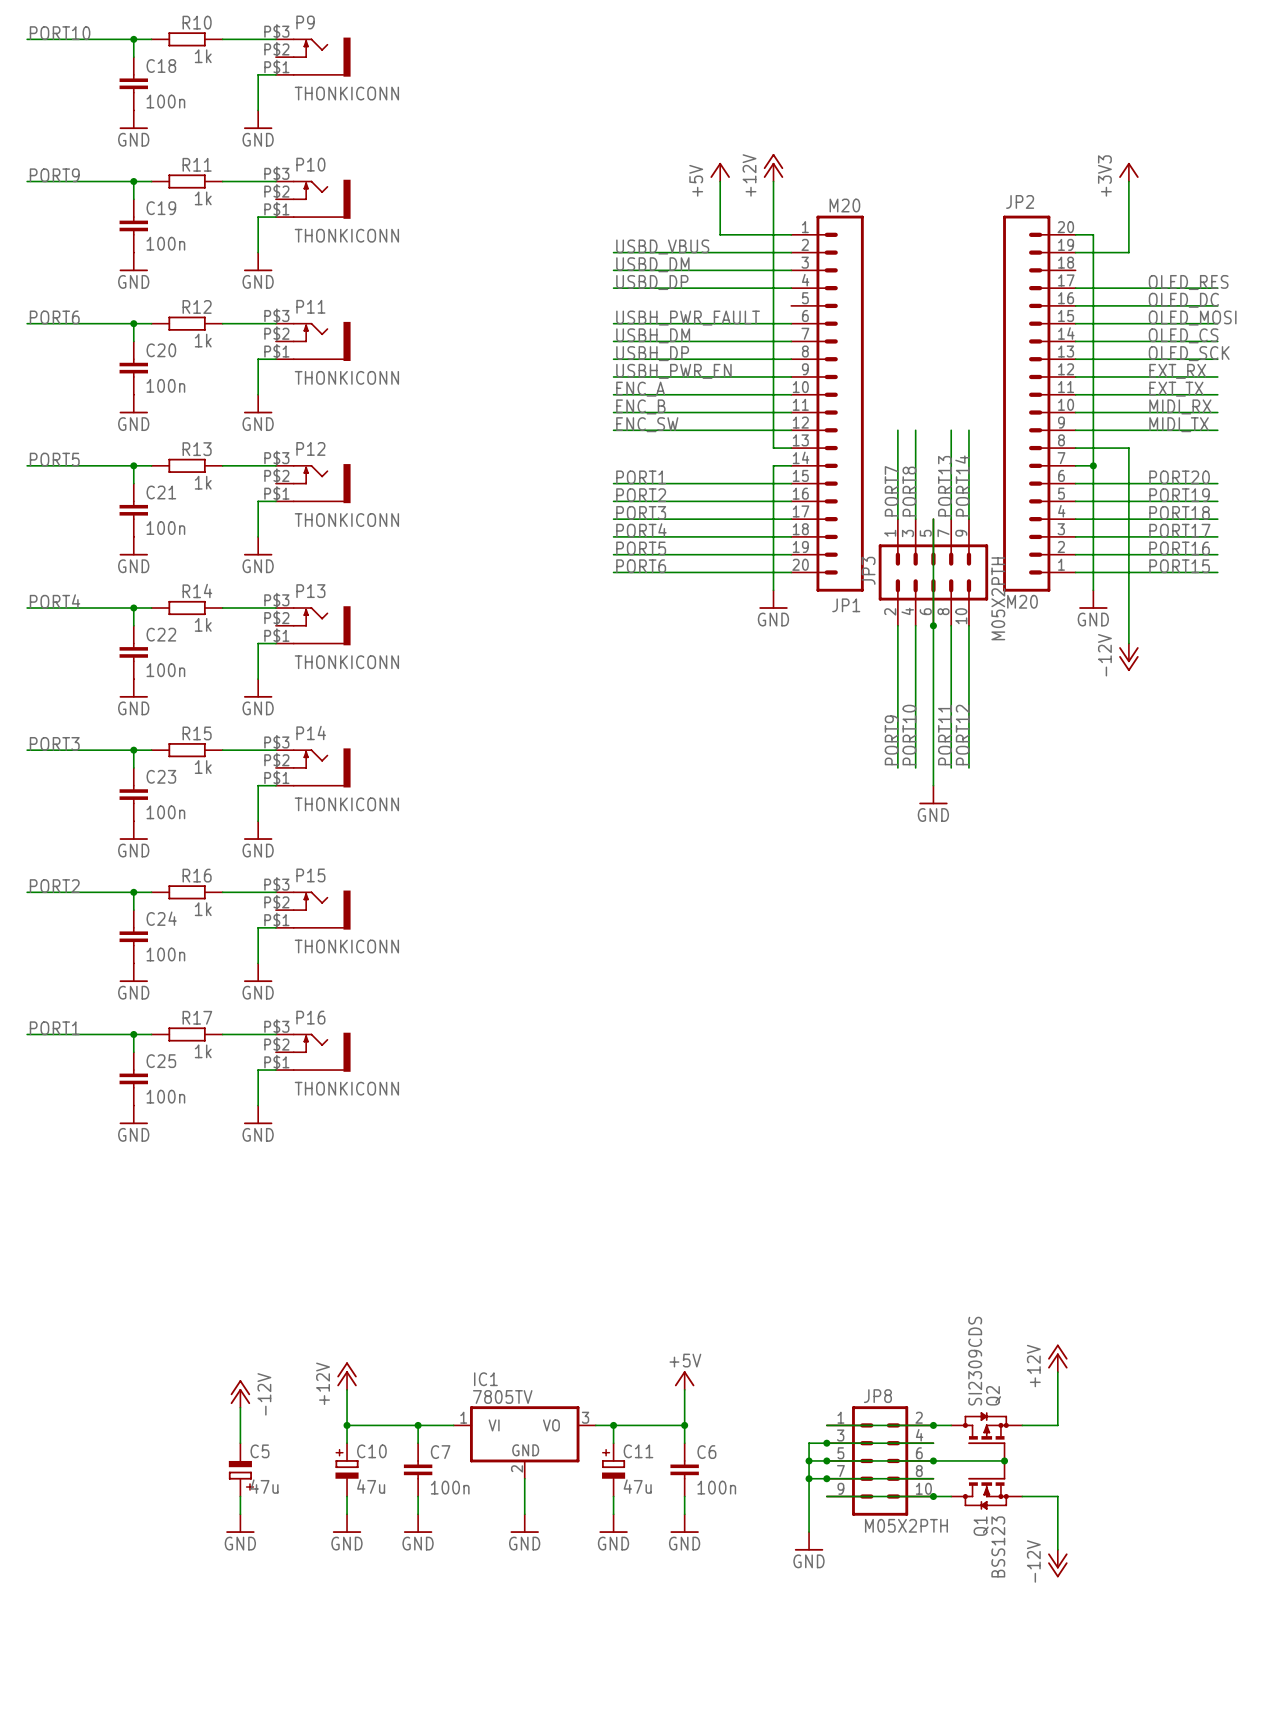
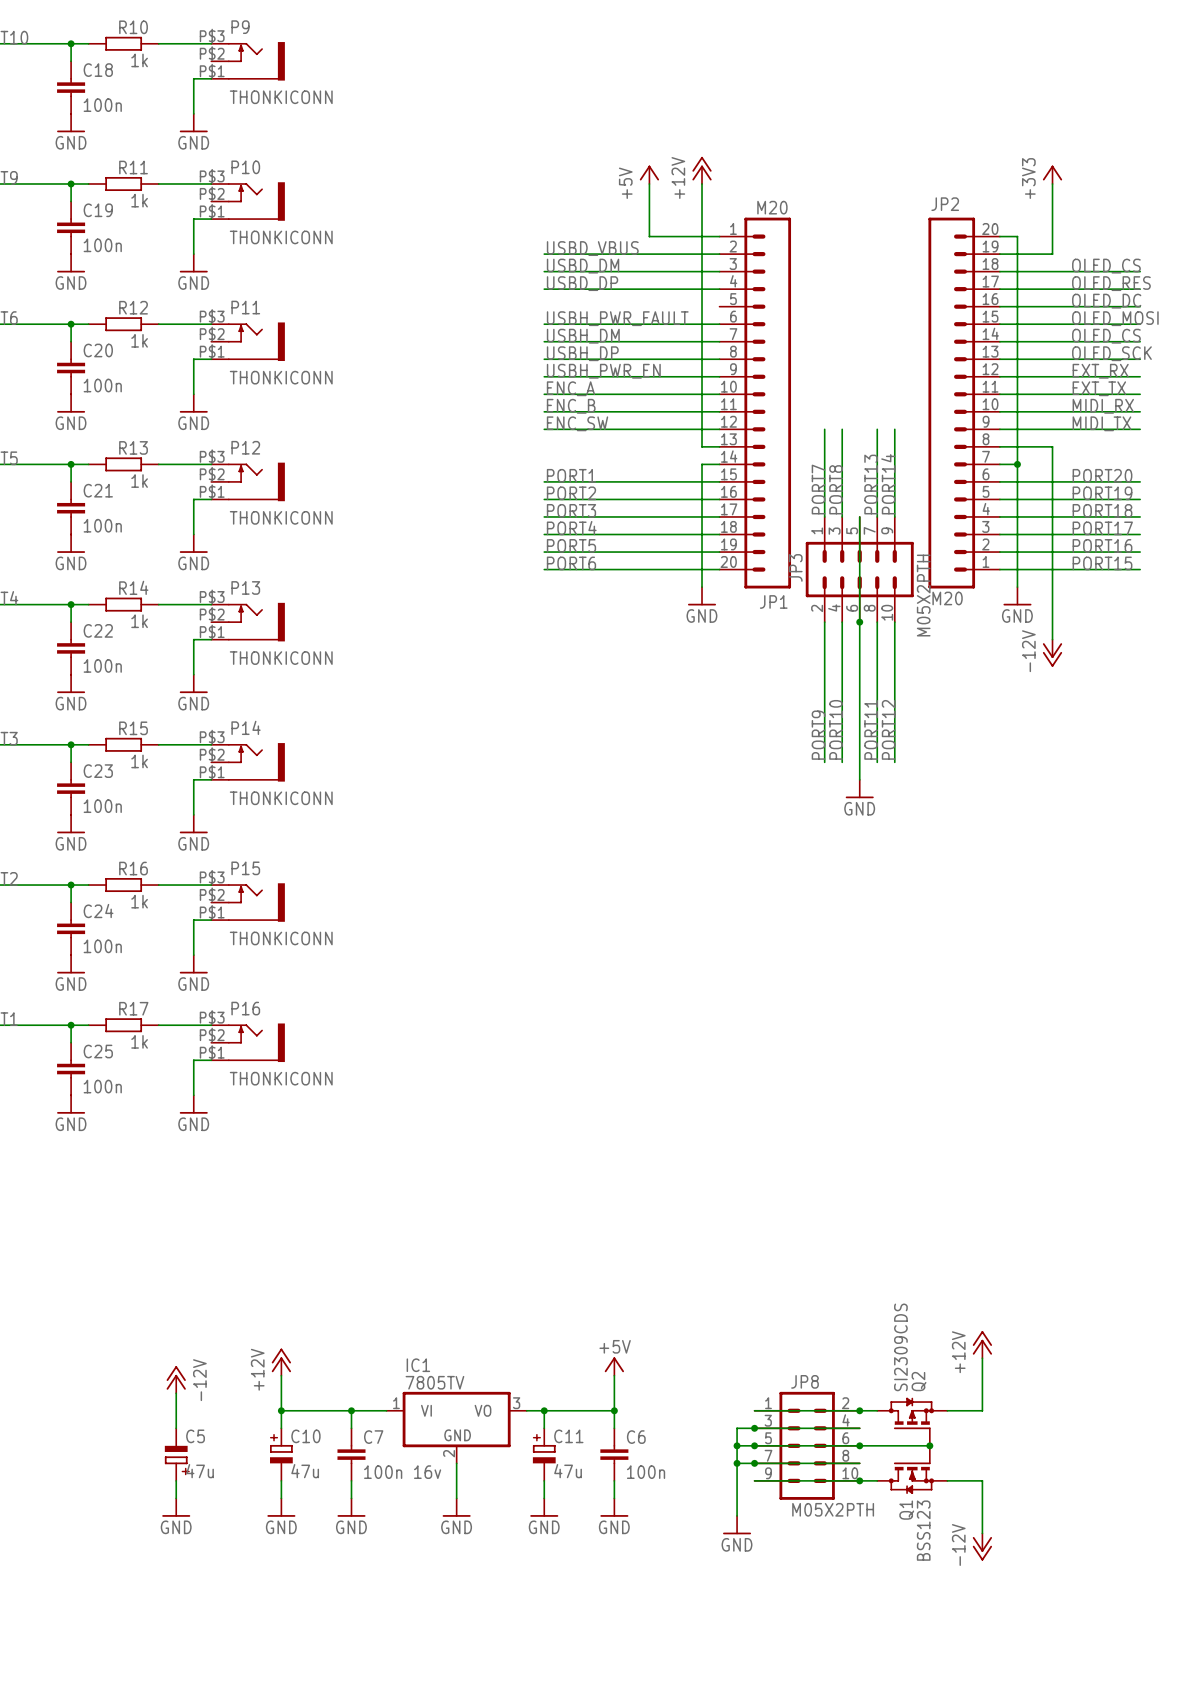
label: none -> OLED_CS (1106, 266)
wire: none -> (999, 271) (1140, 271)
C7 value: 100n (450, 1487) -> 100n 16v (402, 1472)

